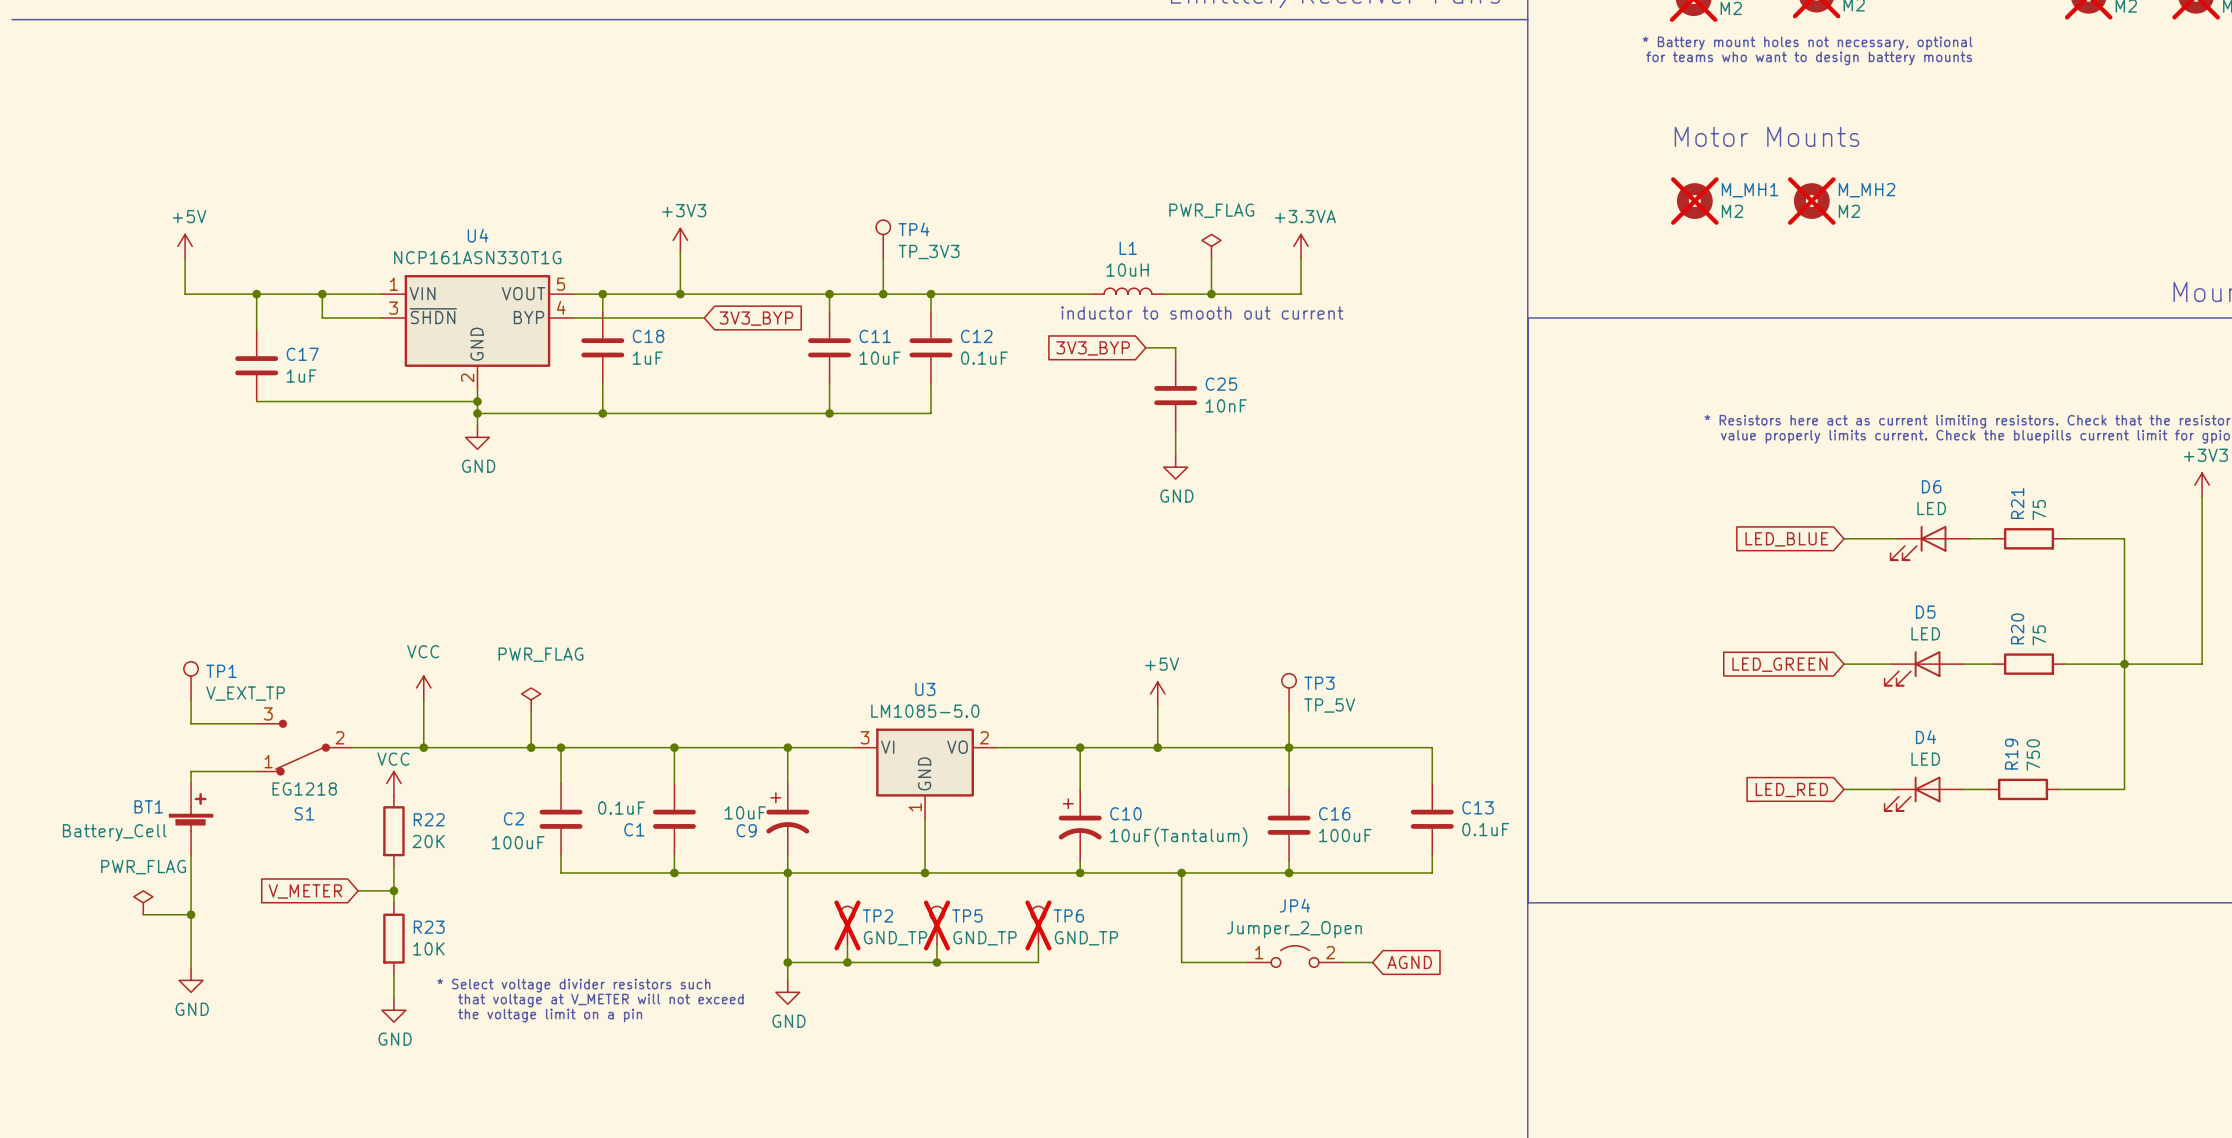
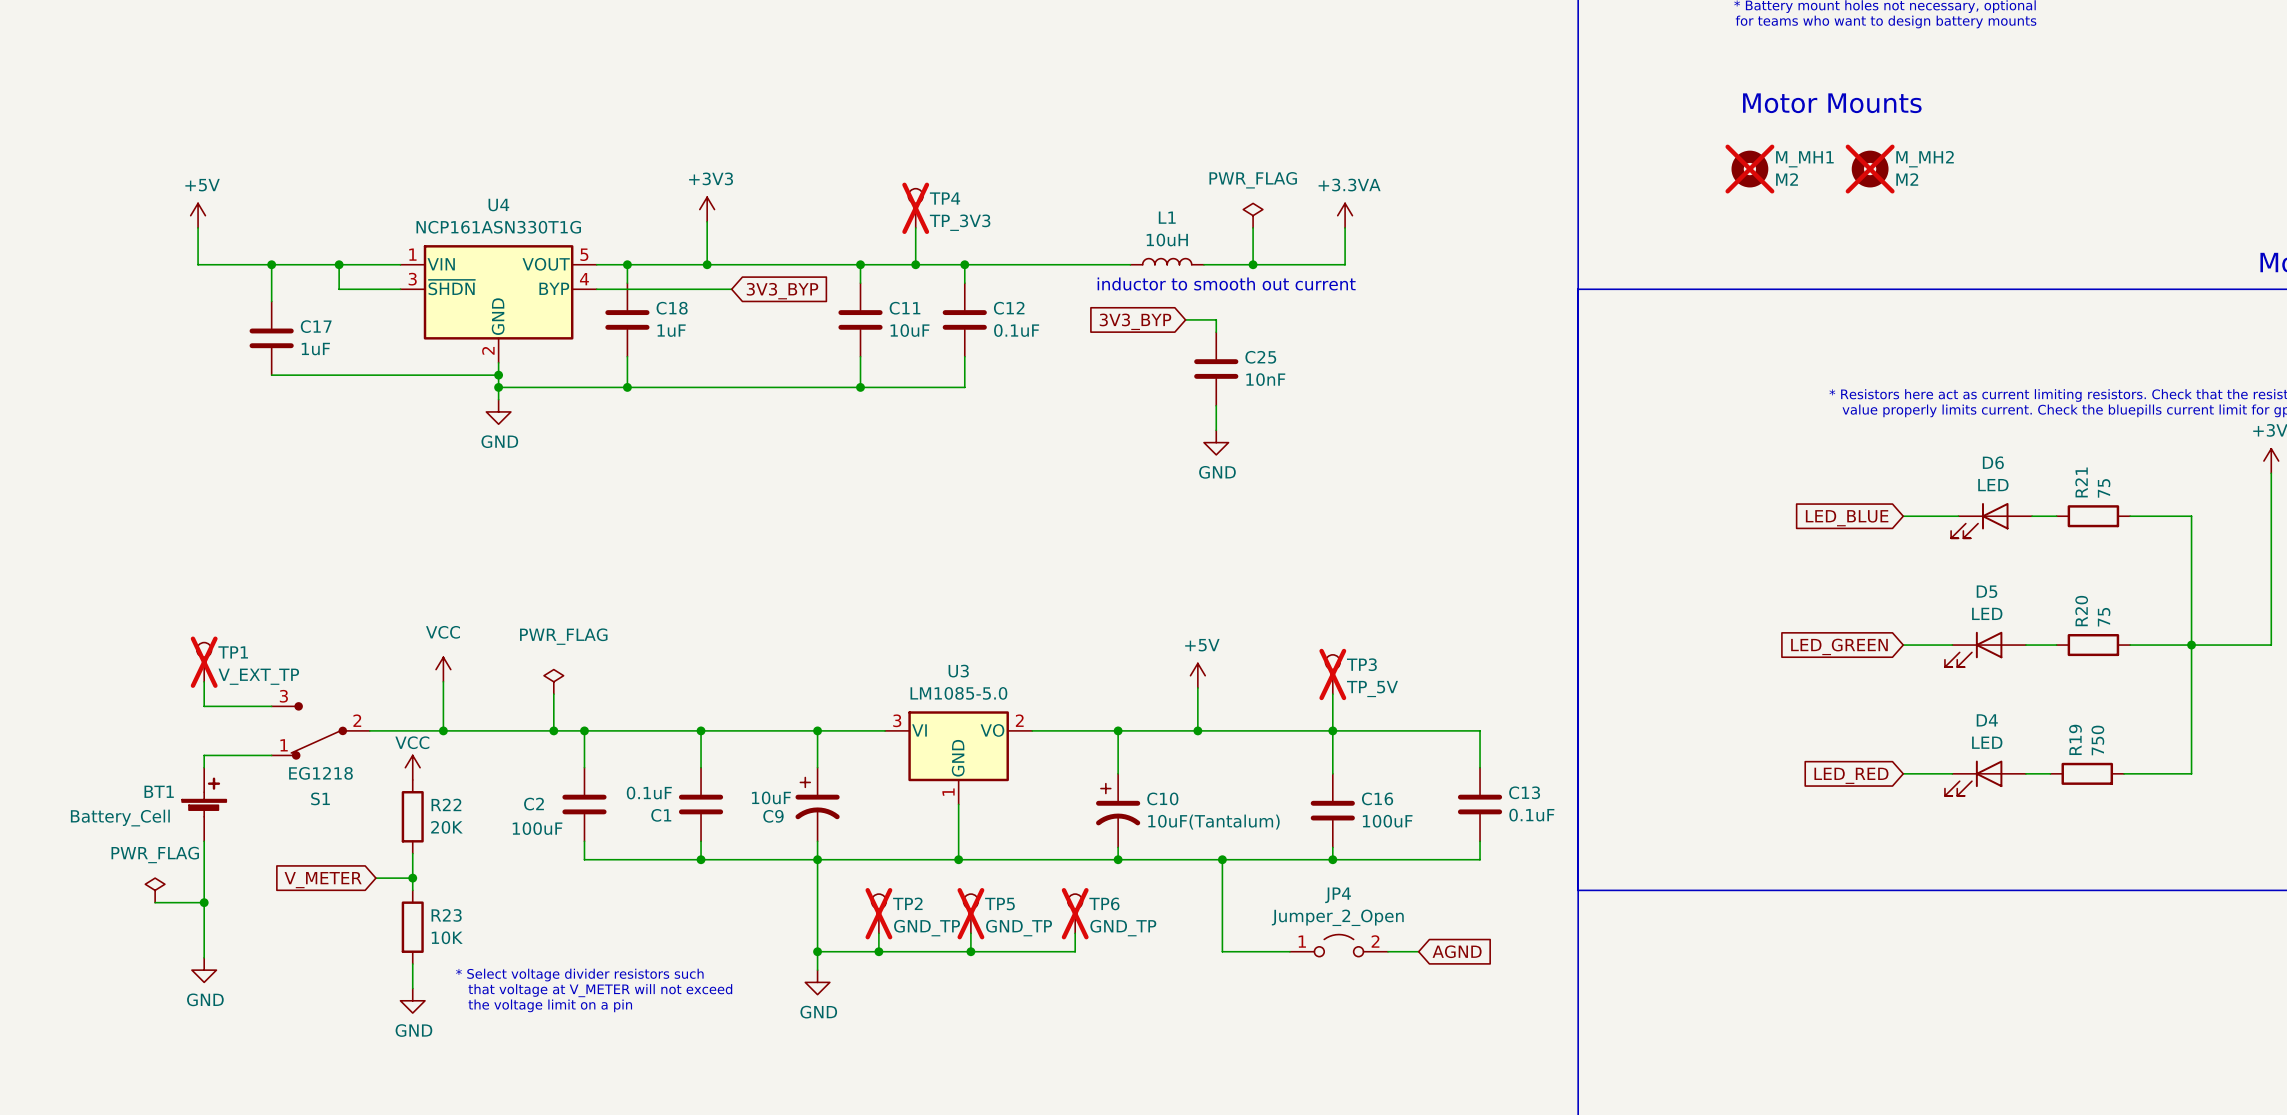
TP4 do-not-place cross: none -> (915, 208)
TP1 do-not-place cross: none -> (204, 662)
TP3 do-not-place cross: none -> (1332, 674)

